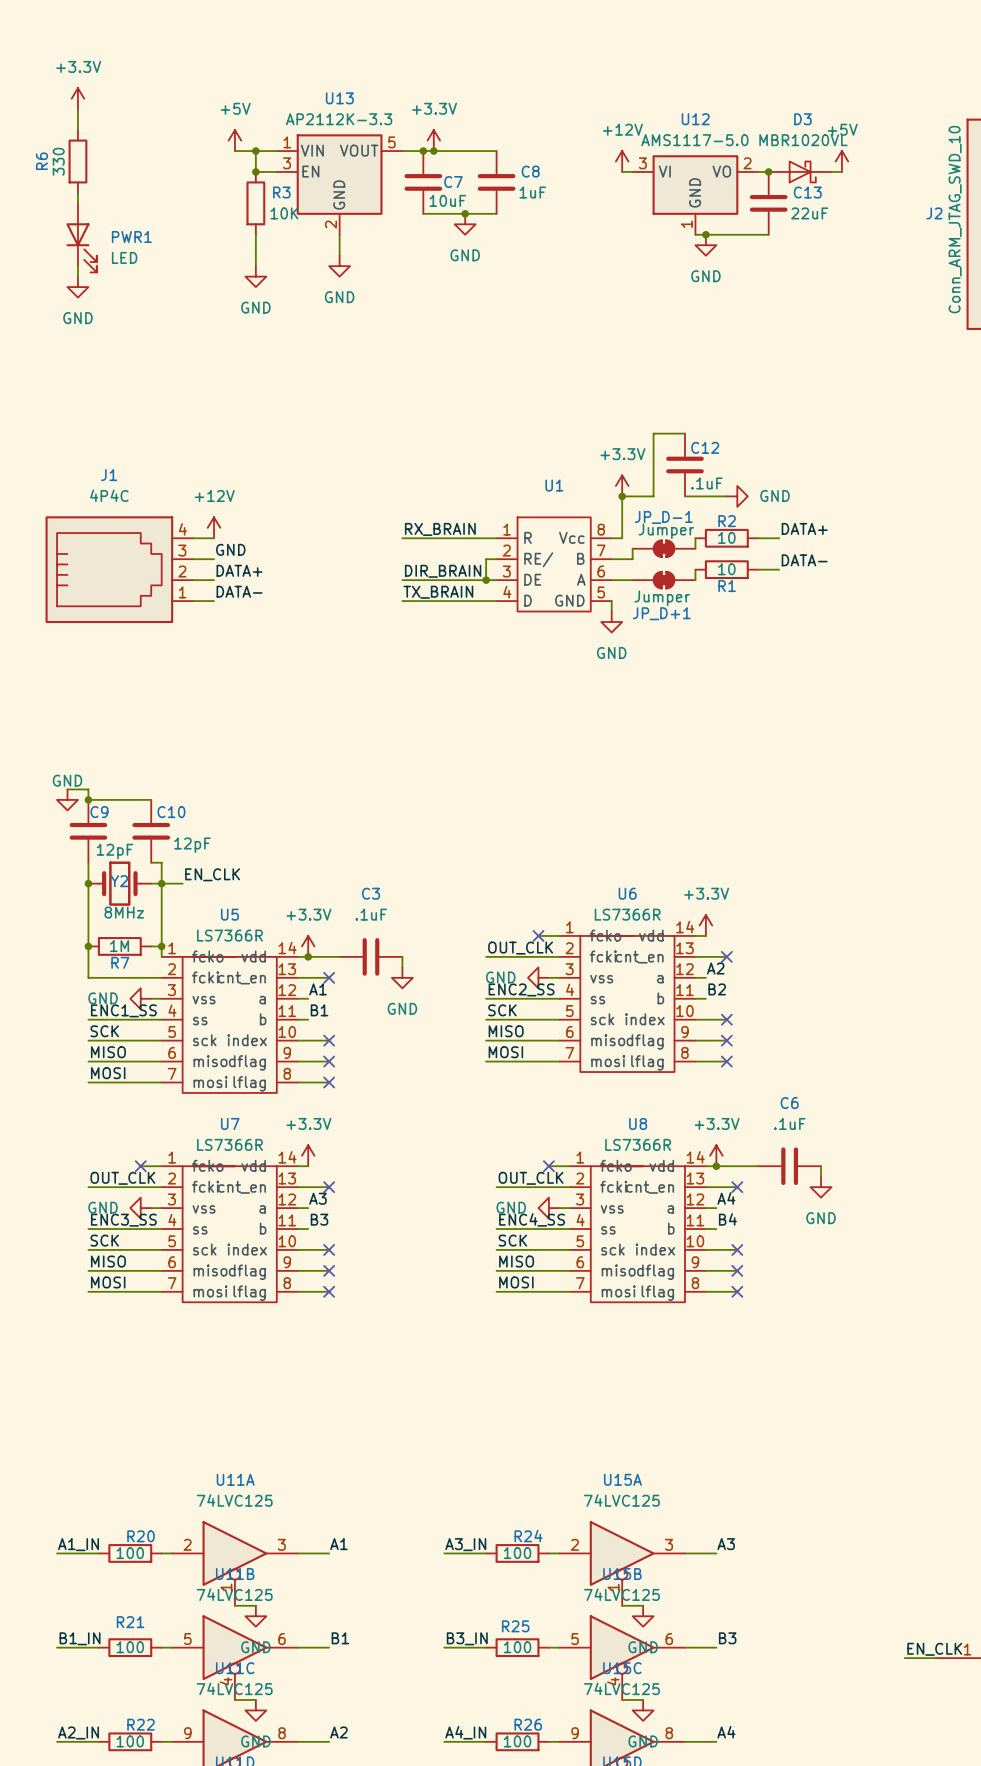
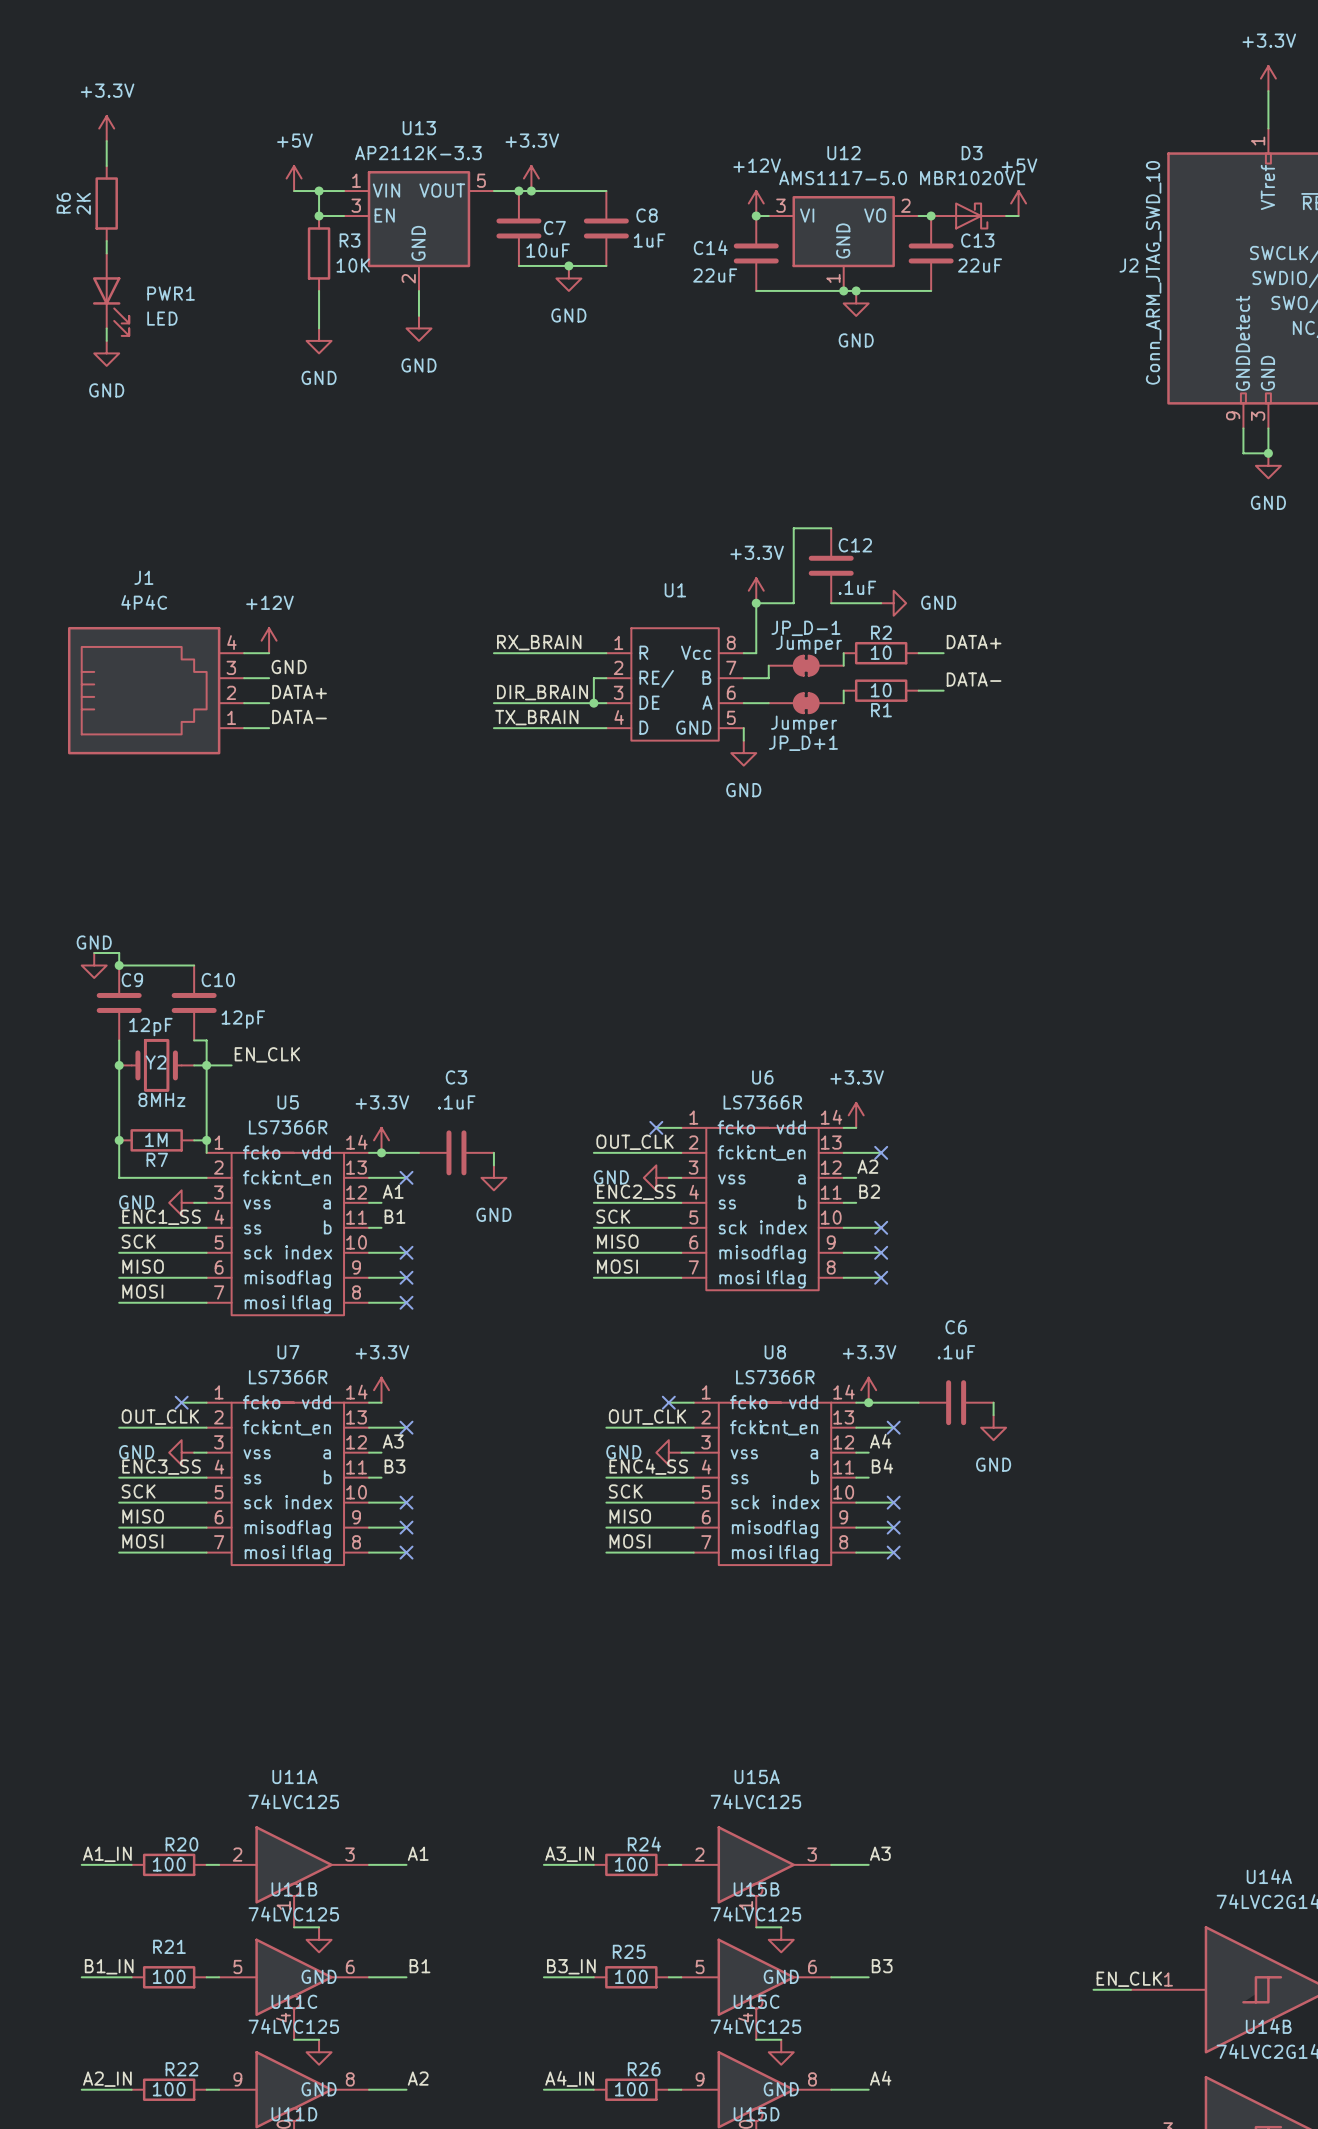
R6 value: 330 (58, 161) -> 2K (83, 203)
junction: none -> (756, 216)
C14: none -> 22uF (756, 253)
wire: none -> (756, 290) (843, 290)
junction: none -> (843, 290)

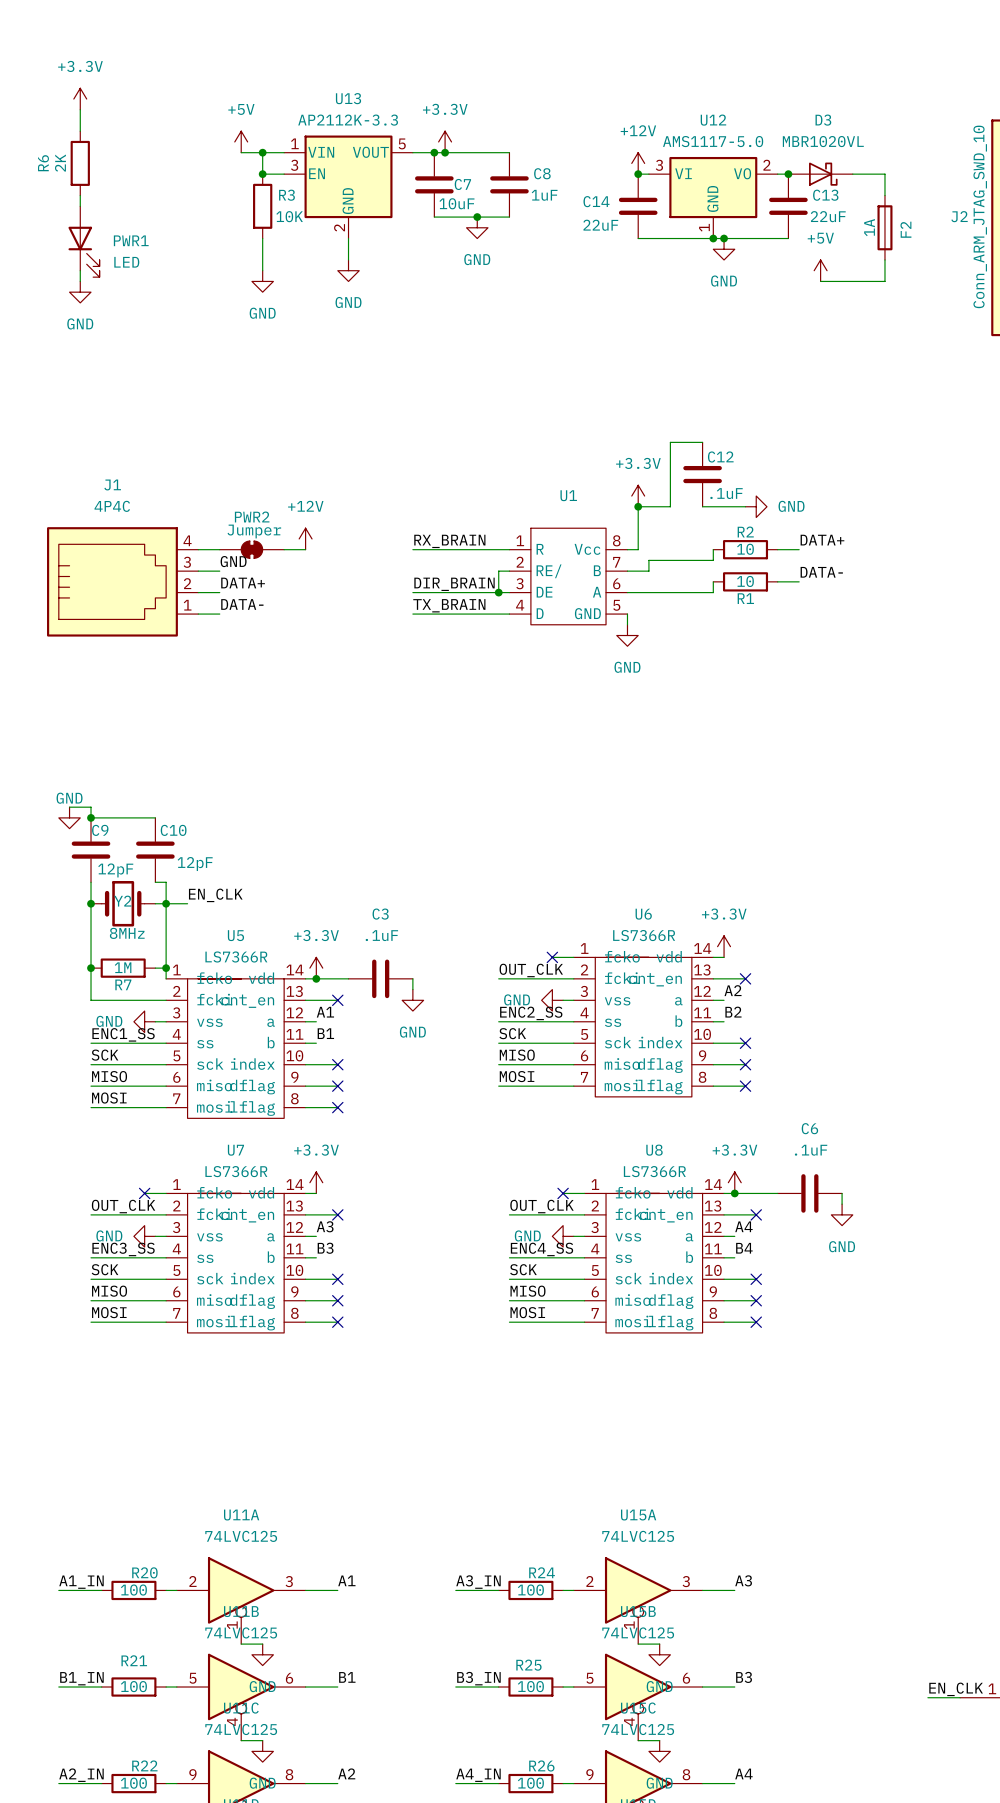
power symbol position: +5V (1018, 203) -> +5V (820, 270)
wire: none -> (863, 174) (884, 174) (884, 195)
F2: none -> 1A (884, 227)
wire: none -> (884, 259) (884, 281) (820, 281)
power symbol position: +12V (269, 640) -> +12V (305, 538)
PWR2: none -> Jumper (251, 549)
wire: none -> (284, 549) (305, 549)
JP_D-1: Jumper (806, 665) -> none
JP_D+1: Jumper (806, 703) -> none

